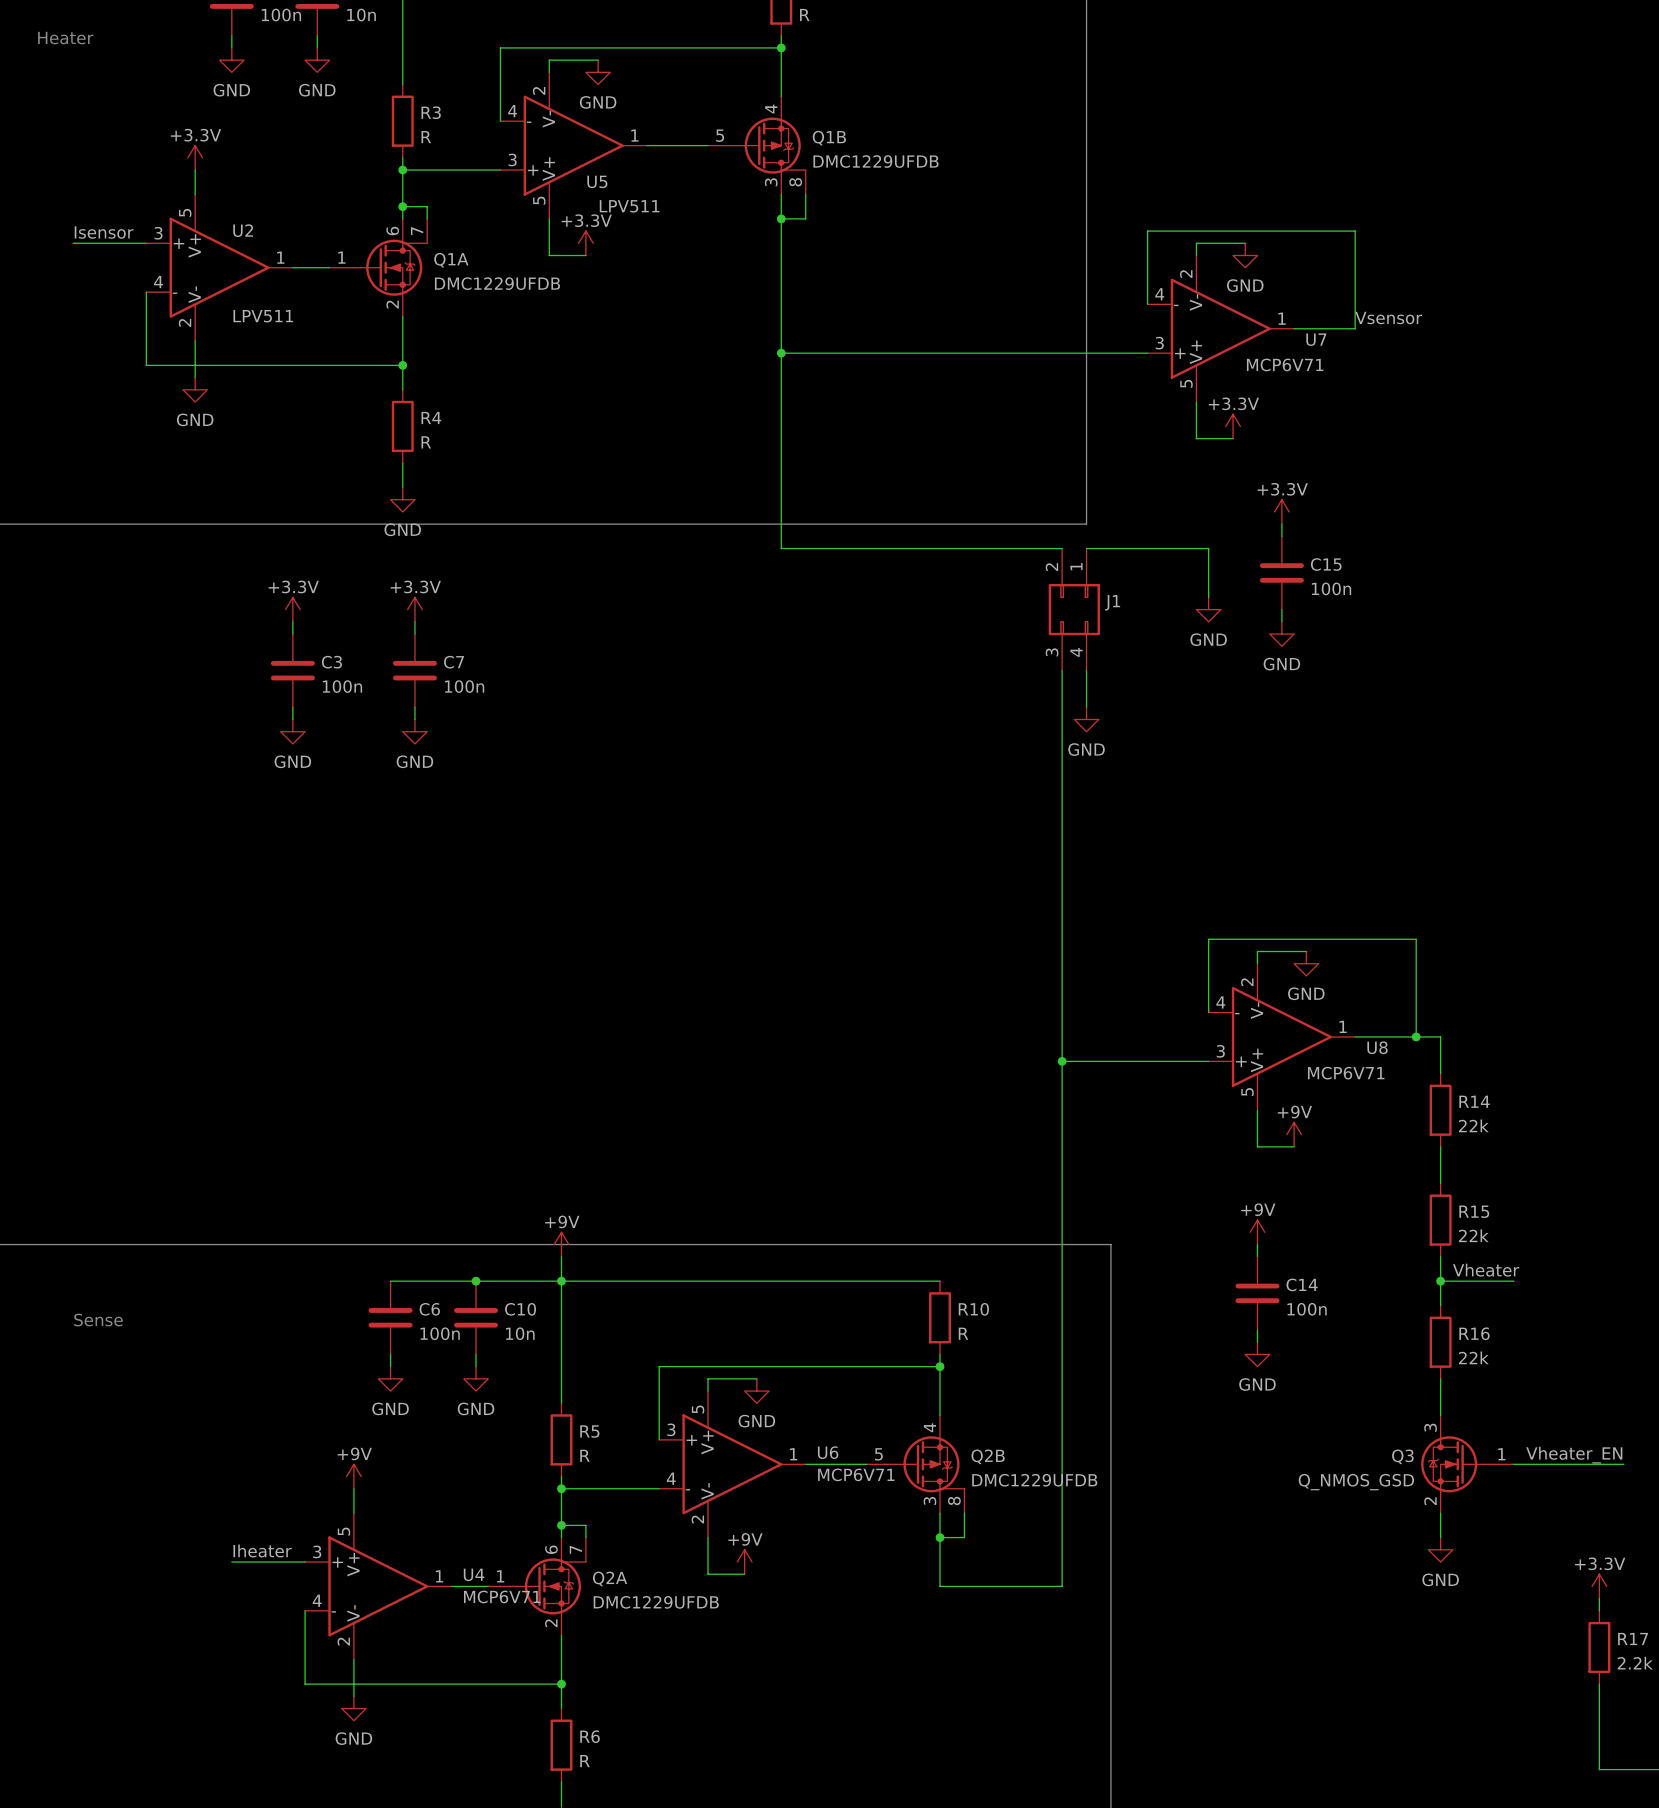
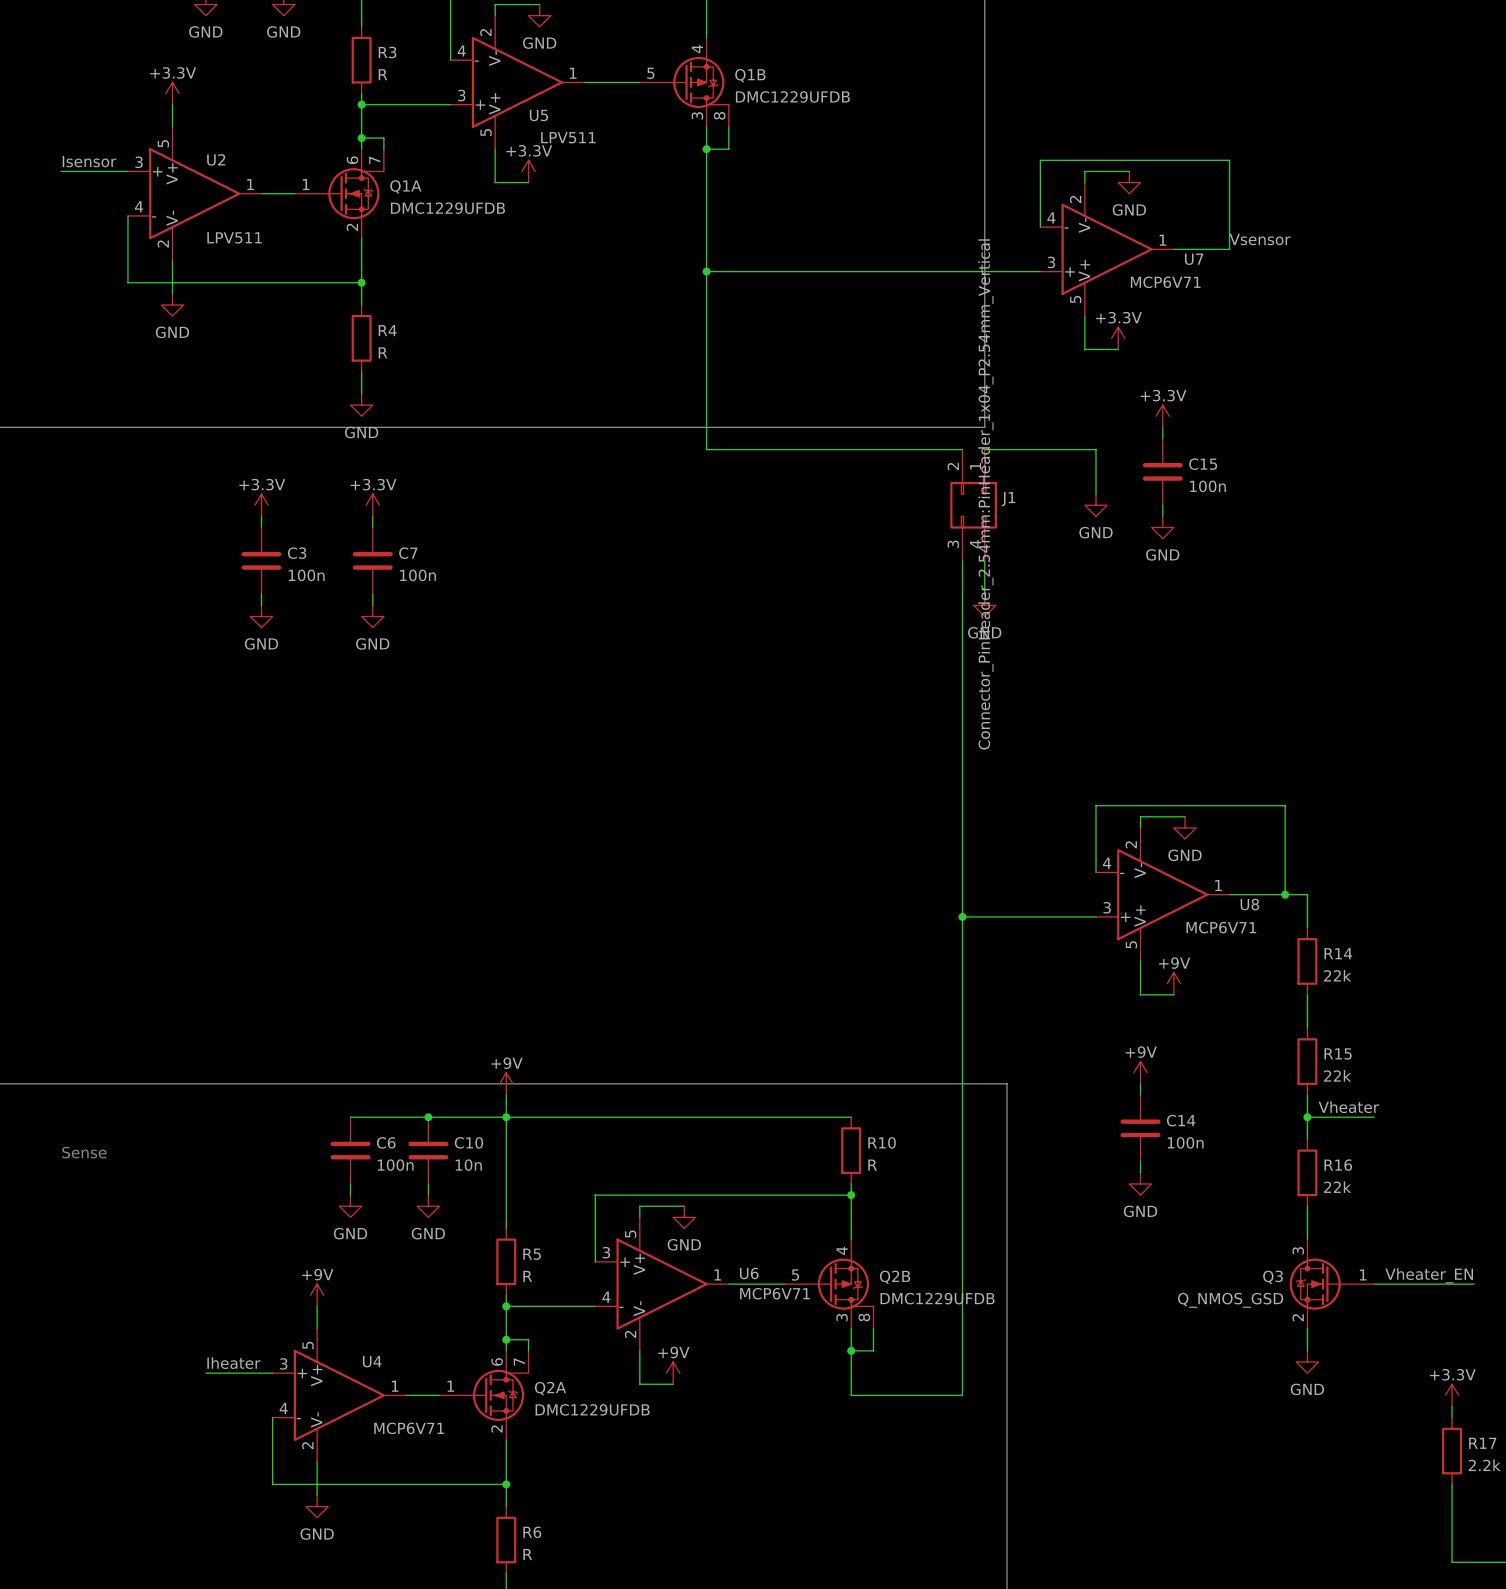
J1 text: none -> Connector_PinHeader_2.54mm:PinHeader_1x04_P2.54mm_Vertical (985, 494)
U4 name position: U4 (474, 1574) -> U4 (372, 1361)
U4 value position: MCP6V71 (502, 1596) -> MCP6V71 (409, 1428)

